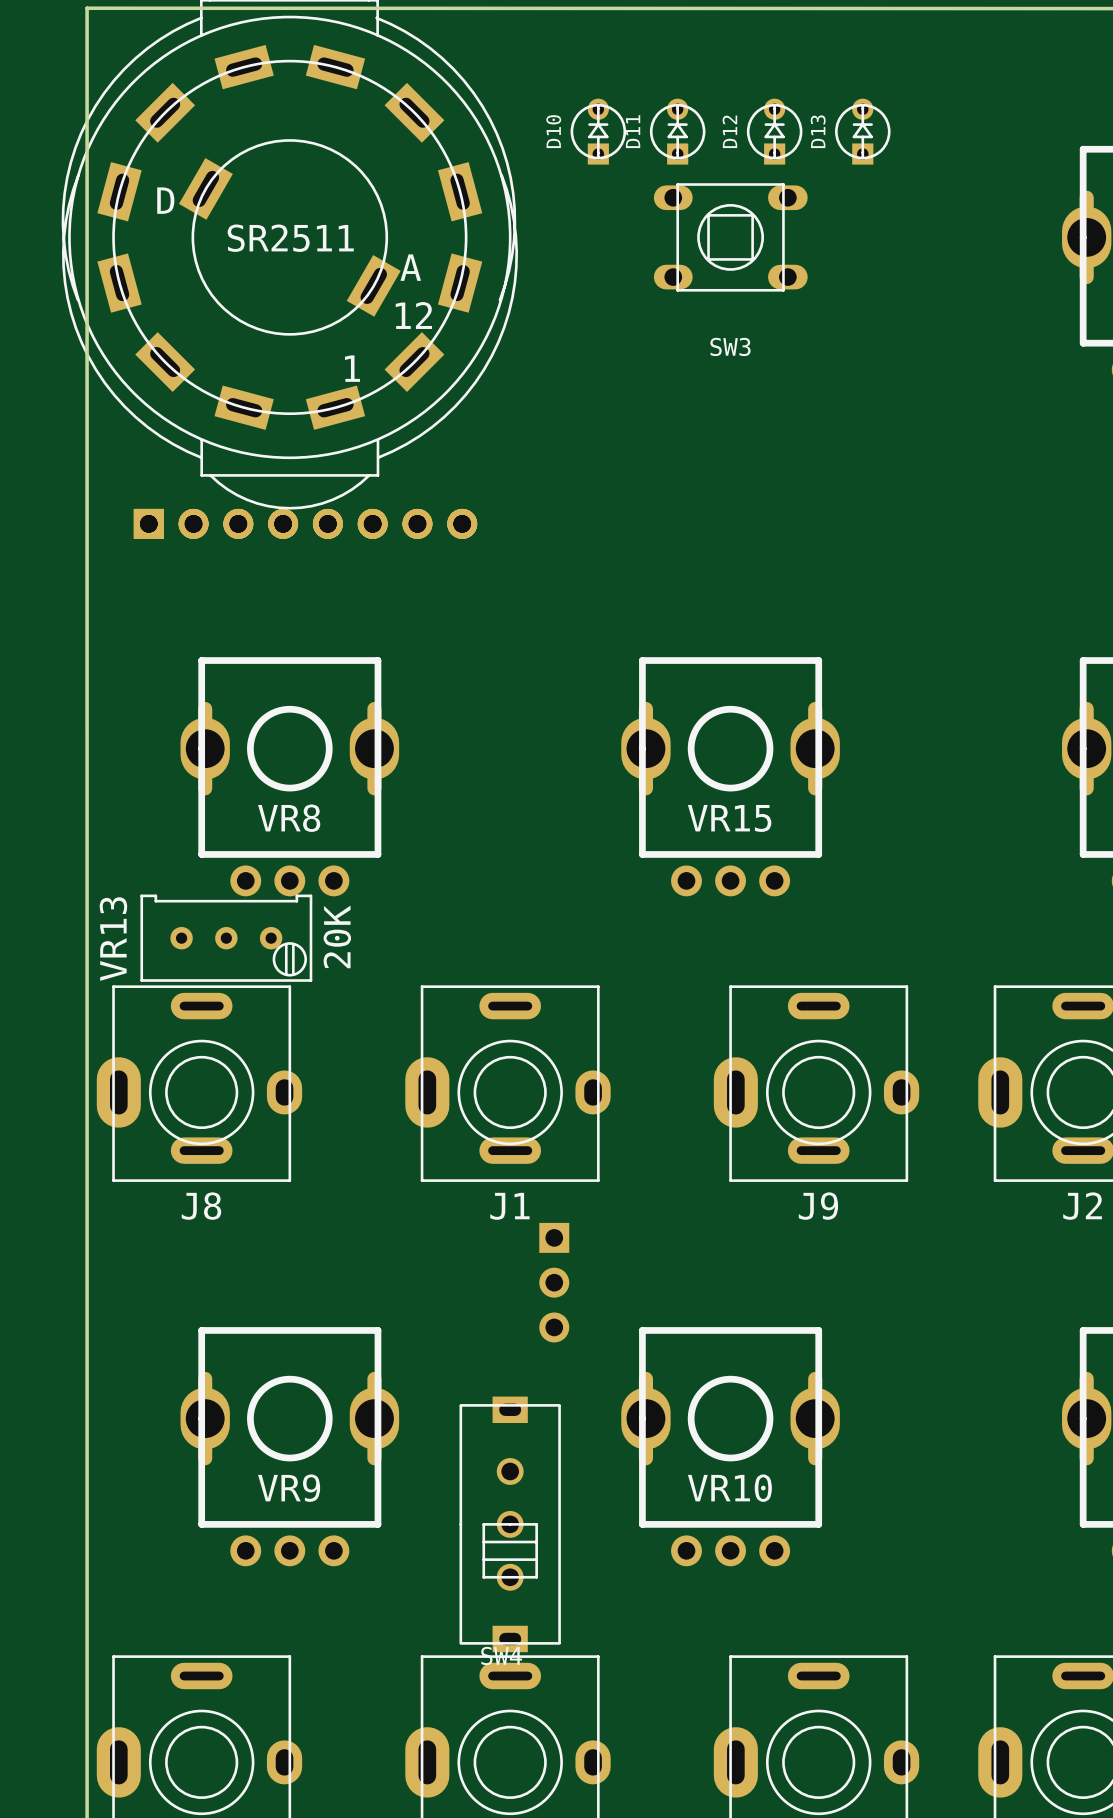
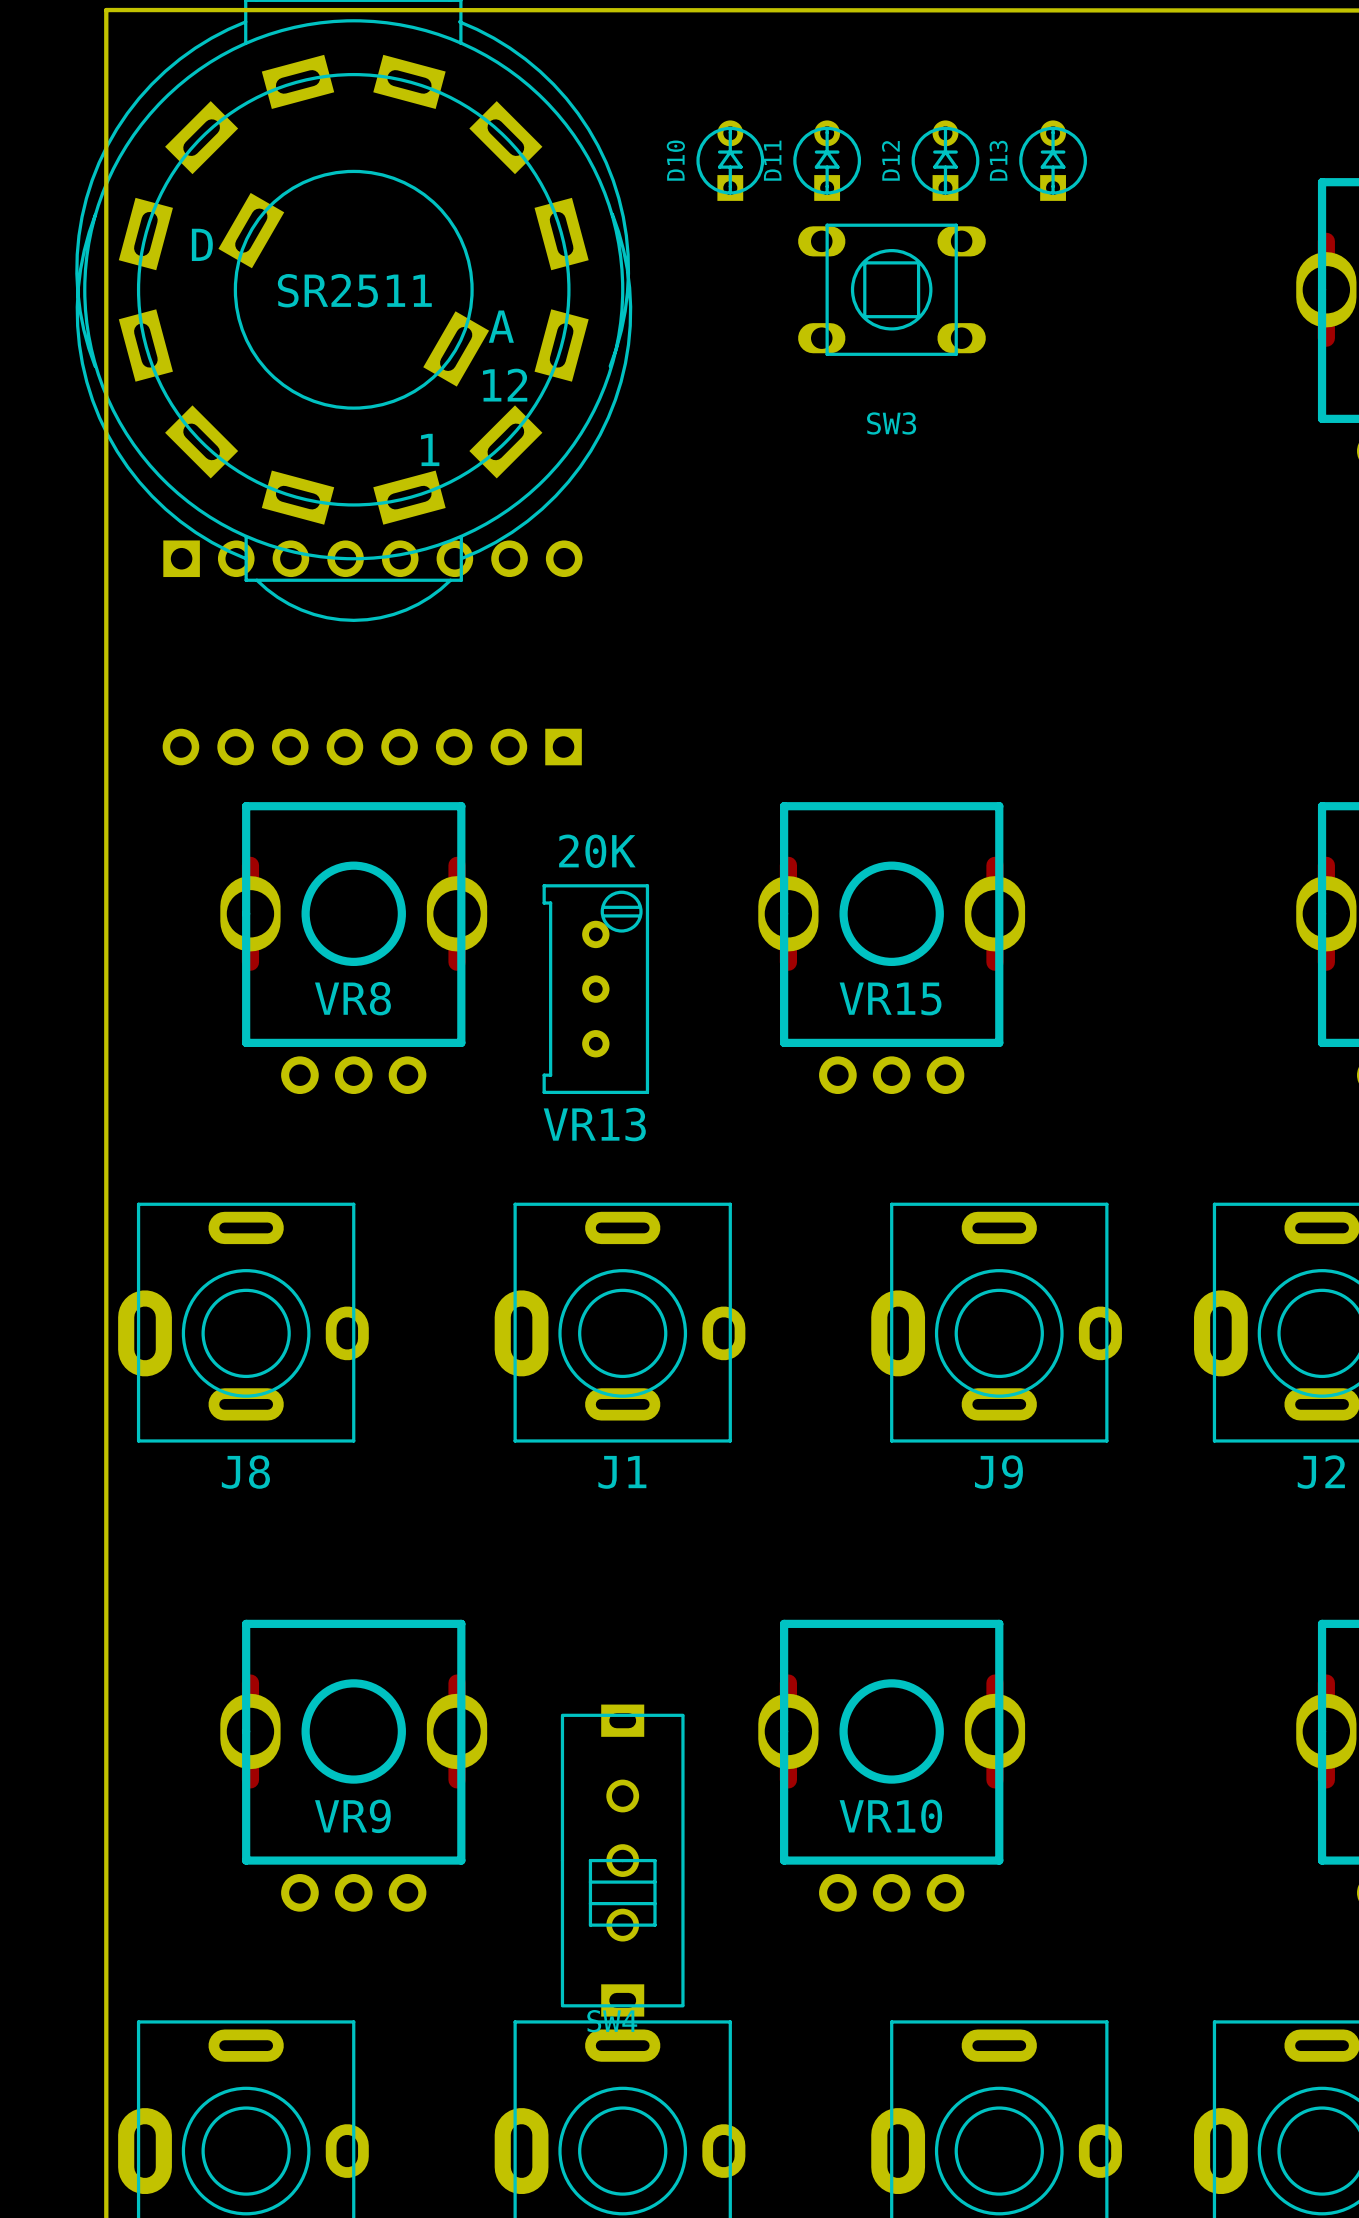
part: none -> (372, 558)
part: (305, 523) -> none
part: none -> (372, 747)
VR13 rotation: 0° (226, 938) -> 90° counterclockwise (595, 989)
VR13 position: (226, 938) -> (595, 989)
part: (554, 1282) -> none

